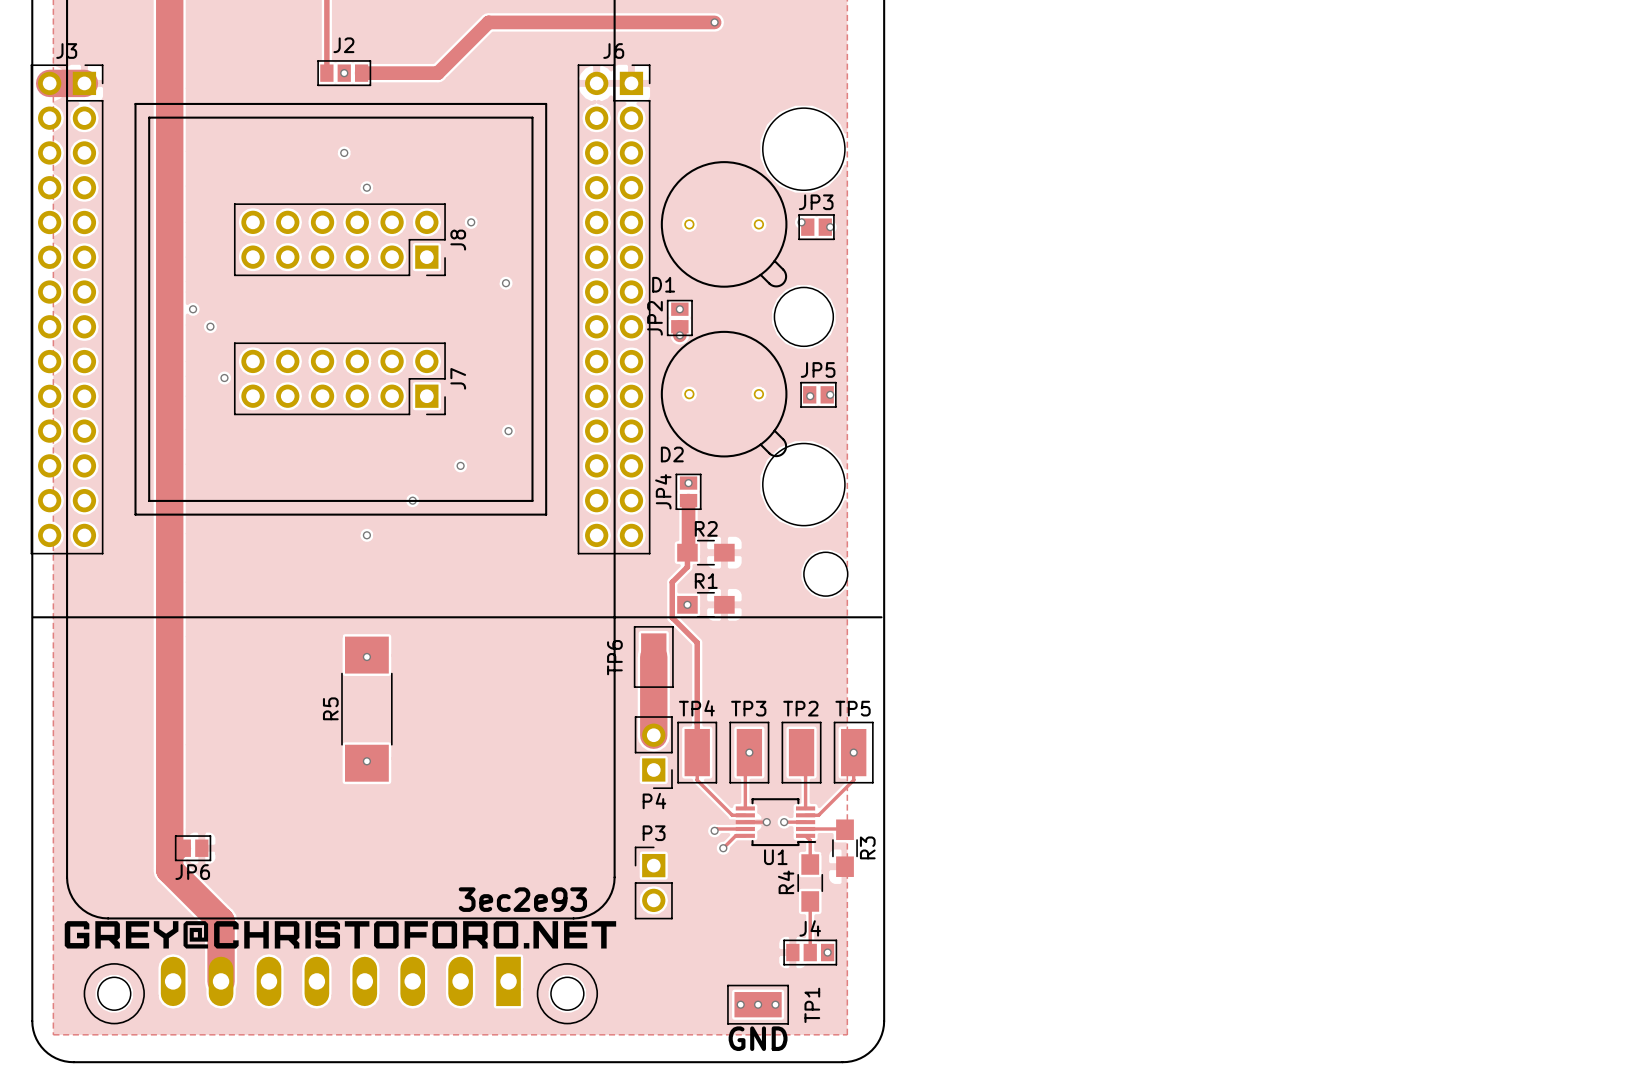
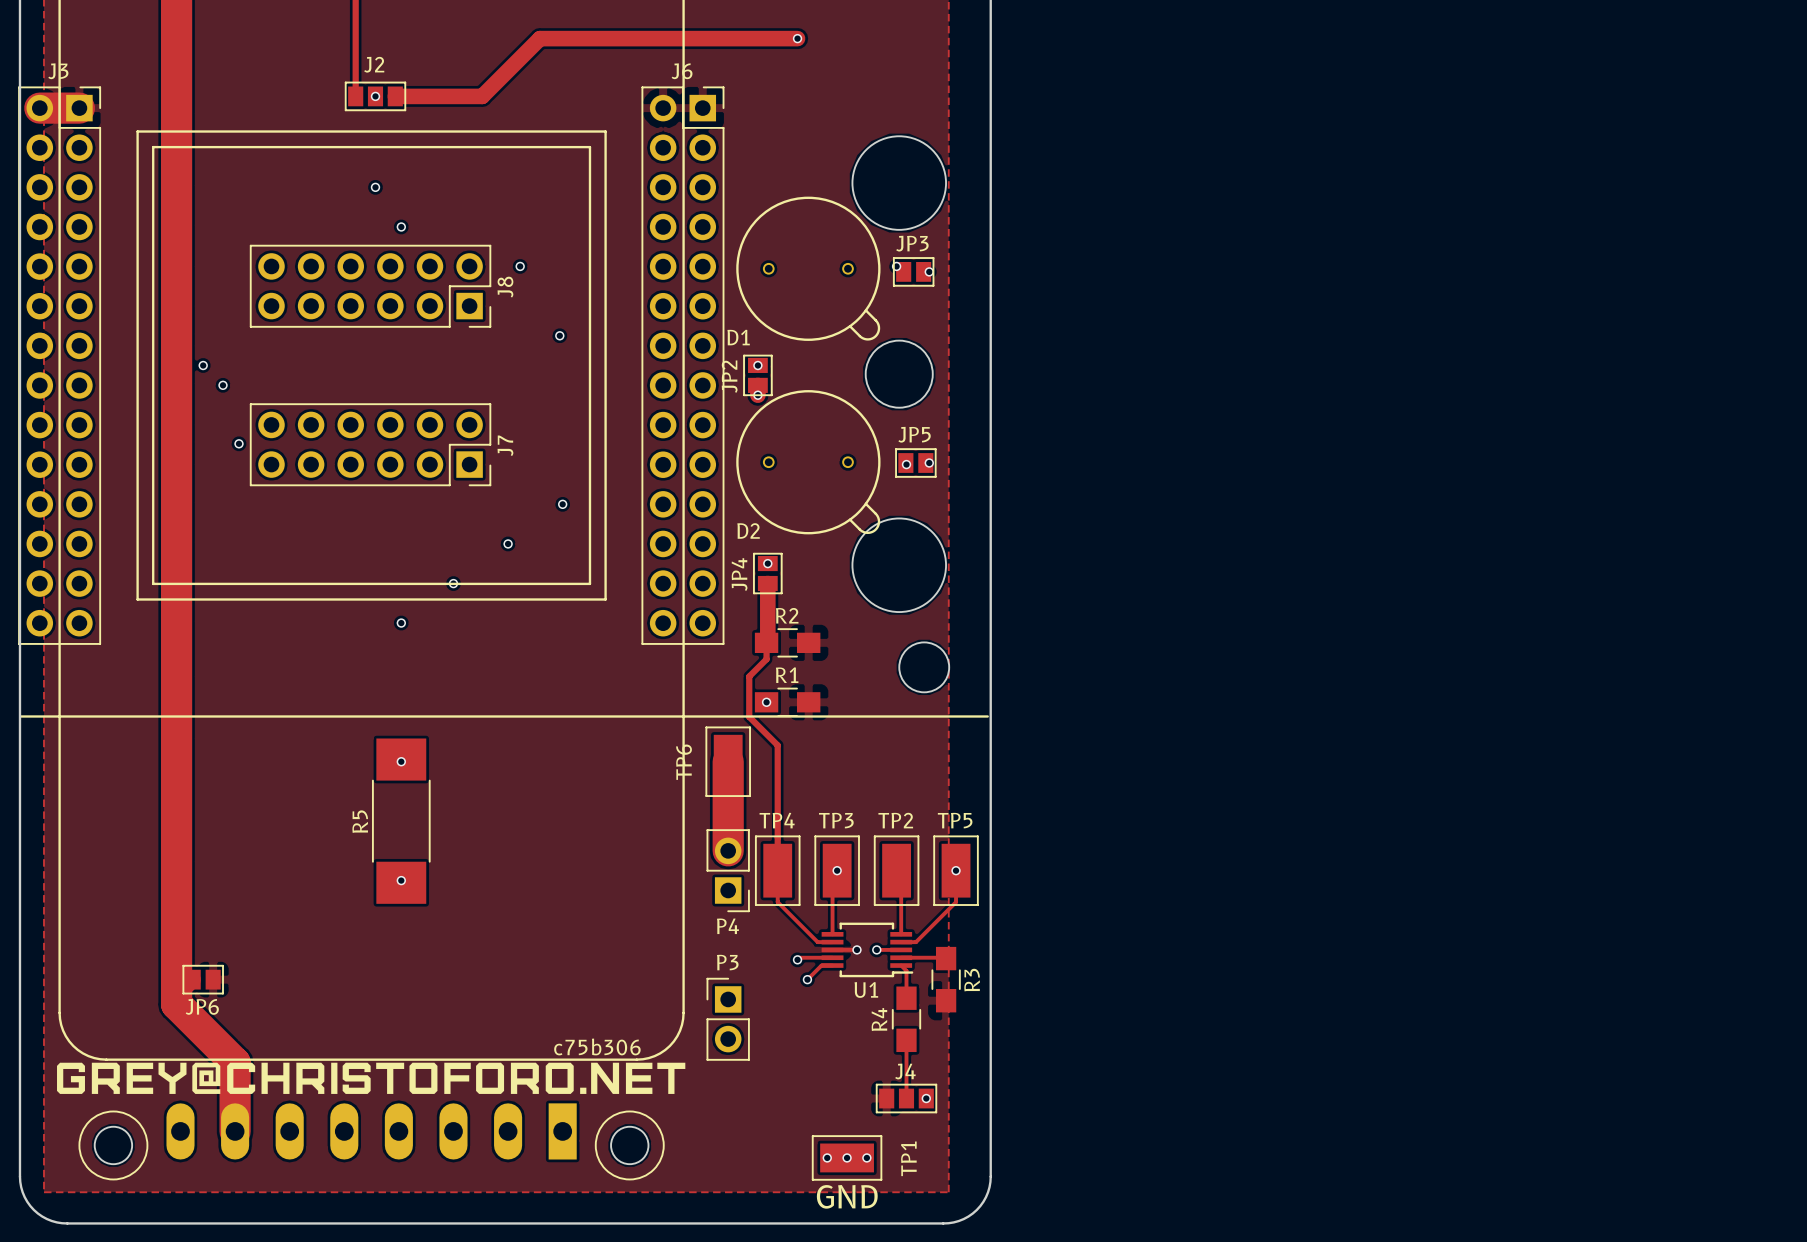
text: 3ec2e93 (522, 899) -> none
text: none -> c75b306 (597, 1046)

